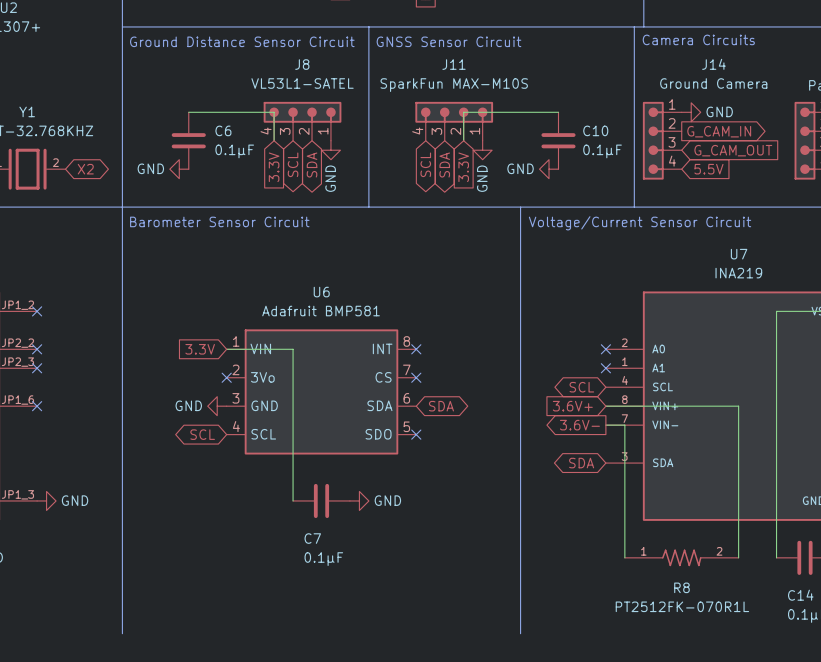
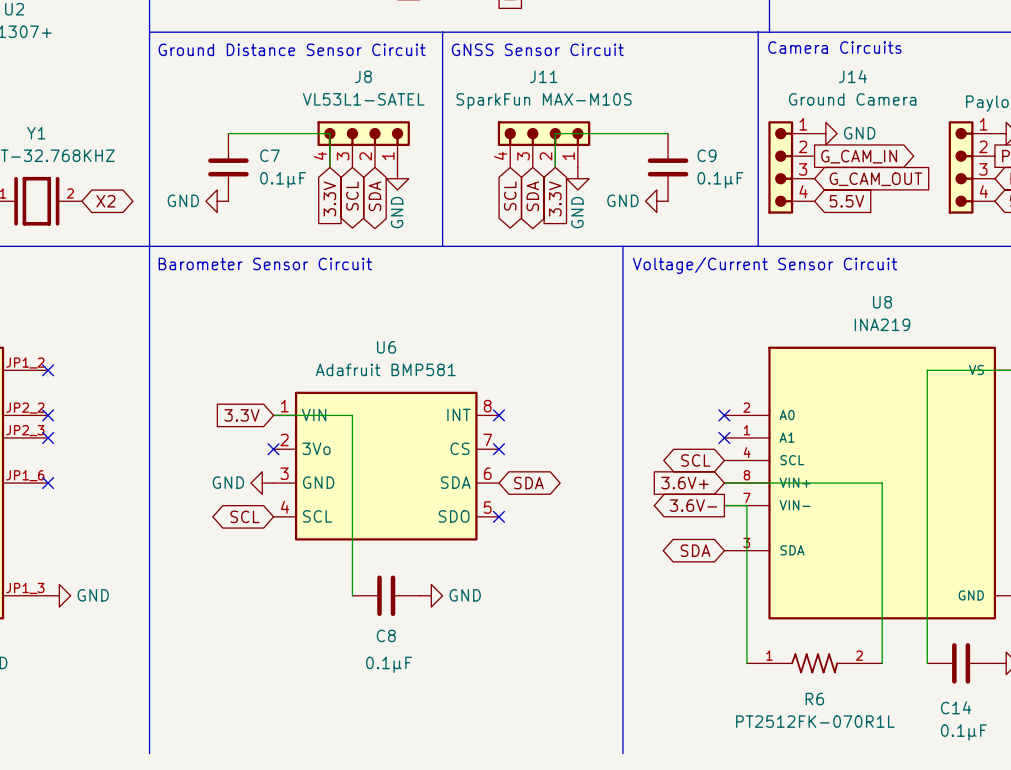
C6 name: C6 (223, 130) -> C7 (269, 155)
C10 name: C10 (595, 130) -> C9 (706, 155)
U7 name: U7 (739, 254) -> U8 (882, 302)
C7 name: C7 (312, 538) -> C8 (386, 635)
R8 name: R8 (681, 587) -> R6 (814, 699)

